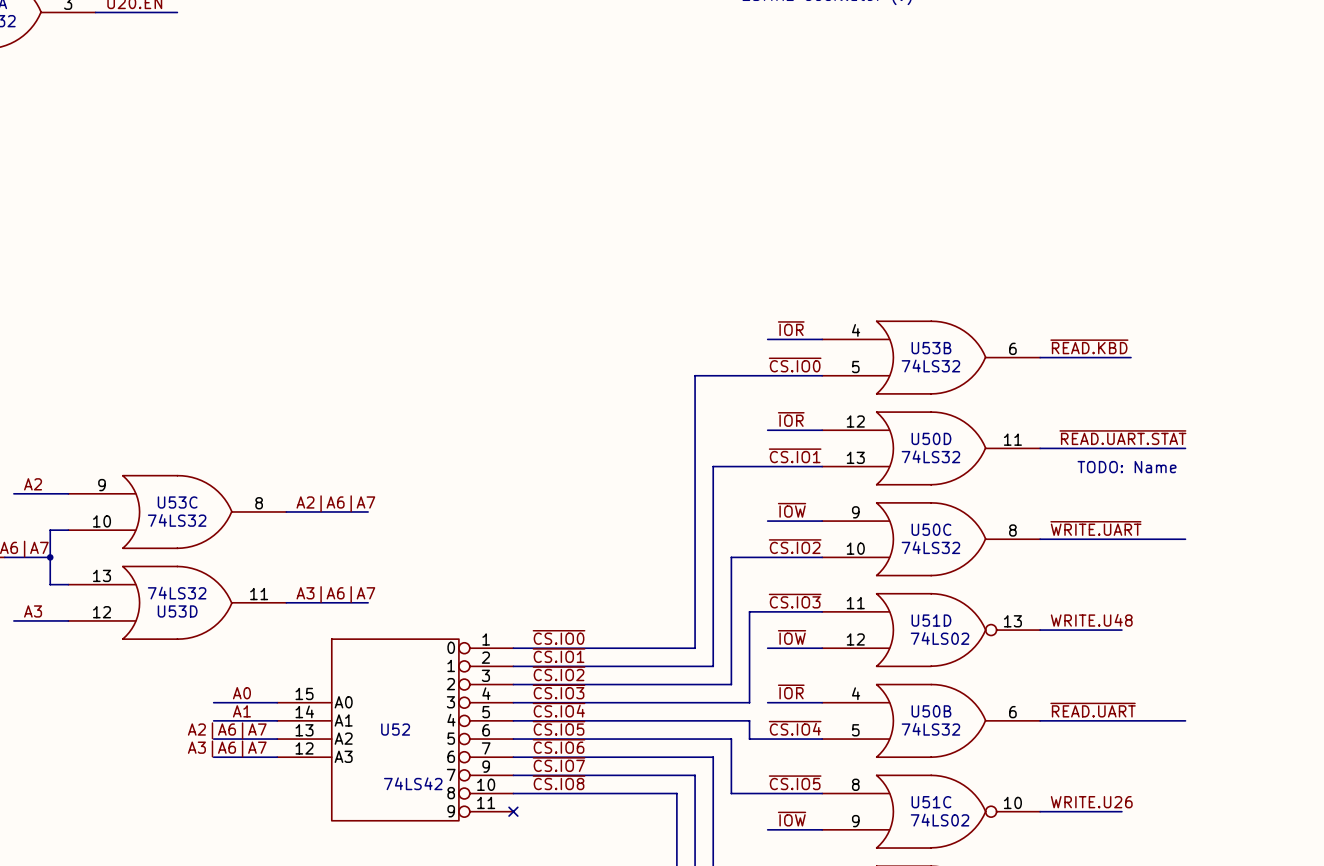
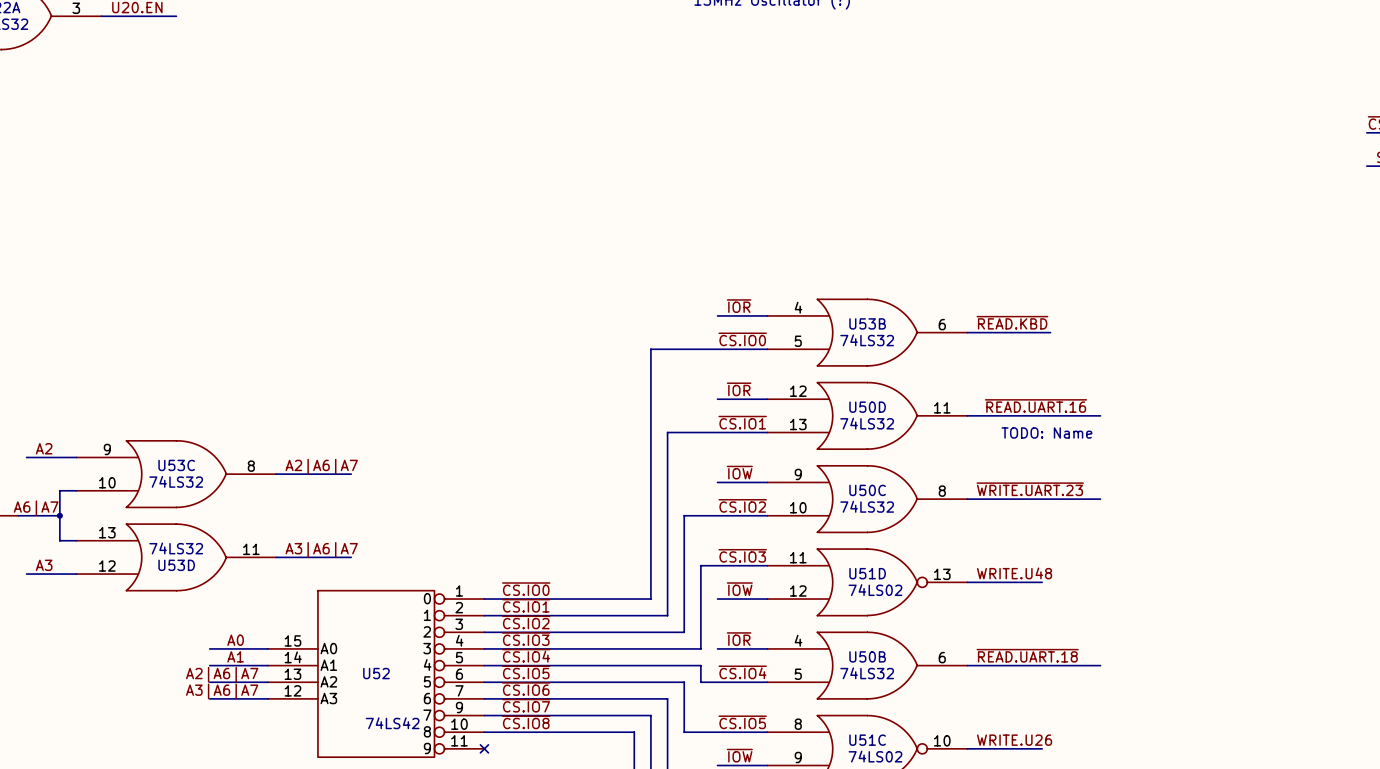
label: ~{READ.UART.STAT} (1122, 437) -> ~{READ.UART.16} (1035, 406)
label: ~{WRITE.UART} (1095, 528) -> ~{WRITE.UART.23} (1030, 489)
label: ~{READ.UART} (1093, 710) -> ~{READ.UART.18} (1027, 655)

